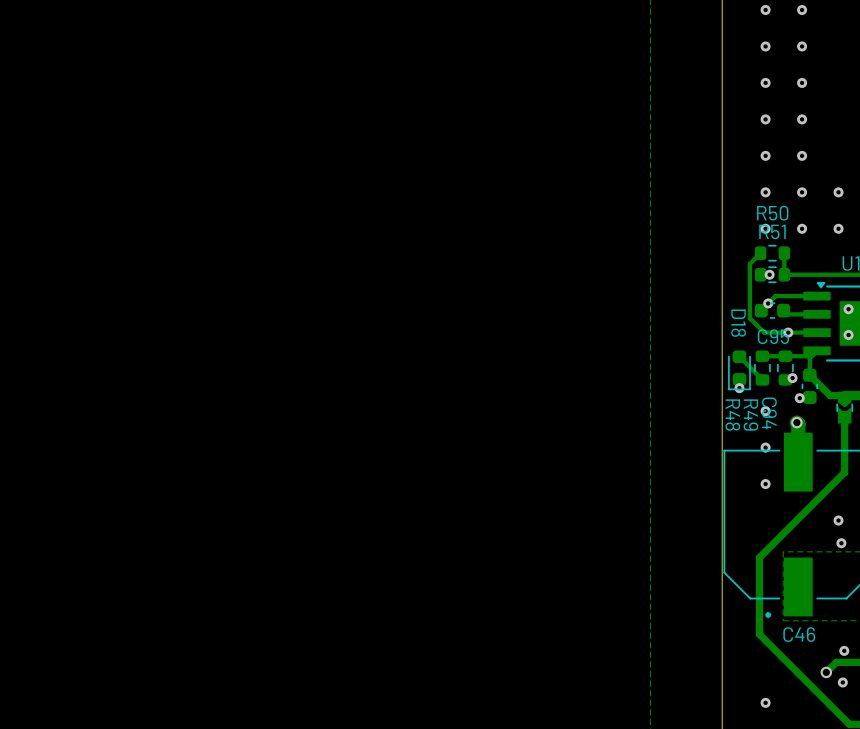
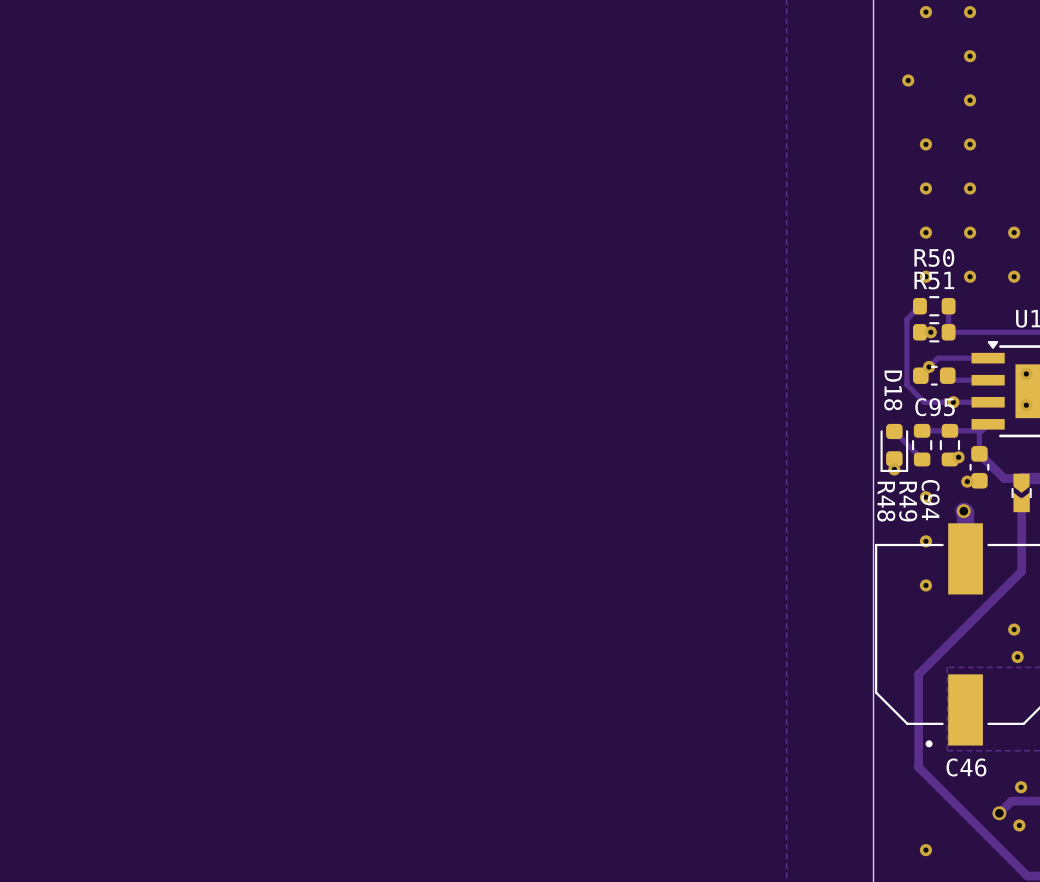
via: (765, 46) -> none
via: none -> (908, 80)
via: (765, 82) -> none

